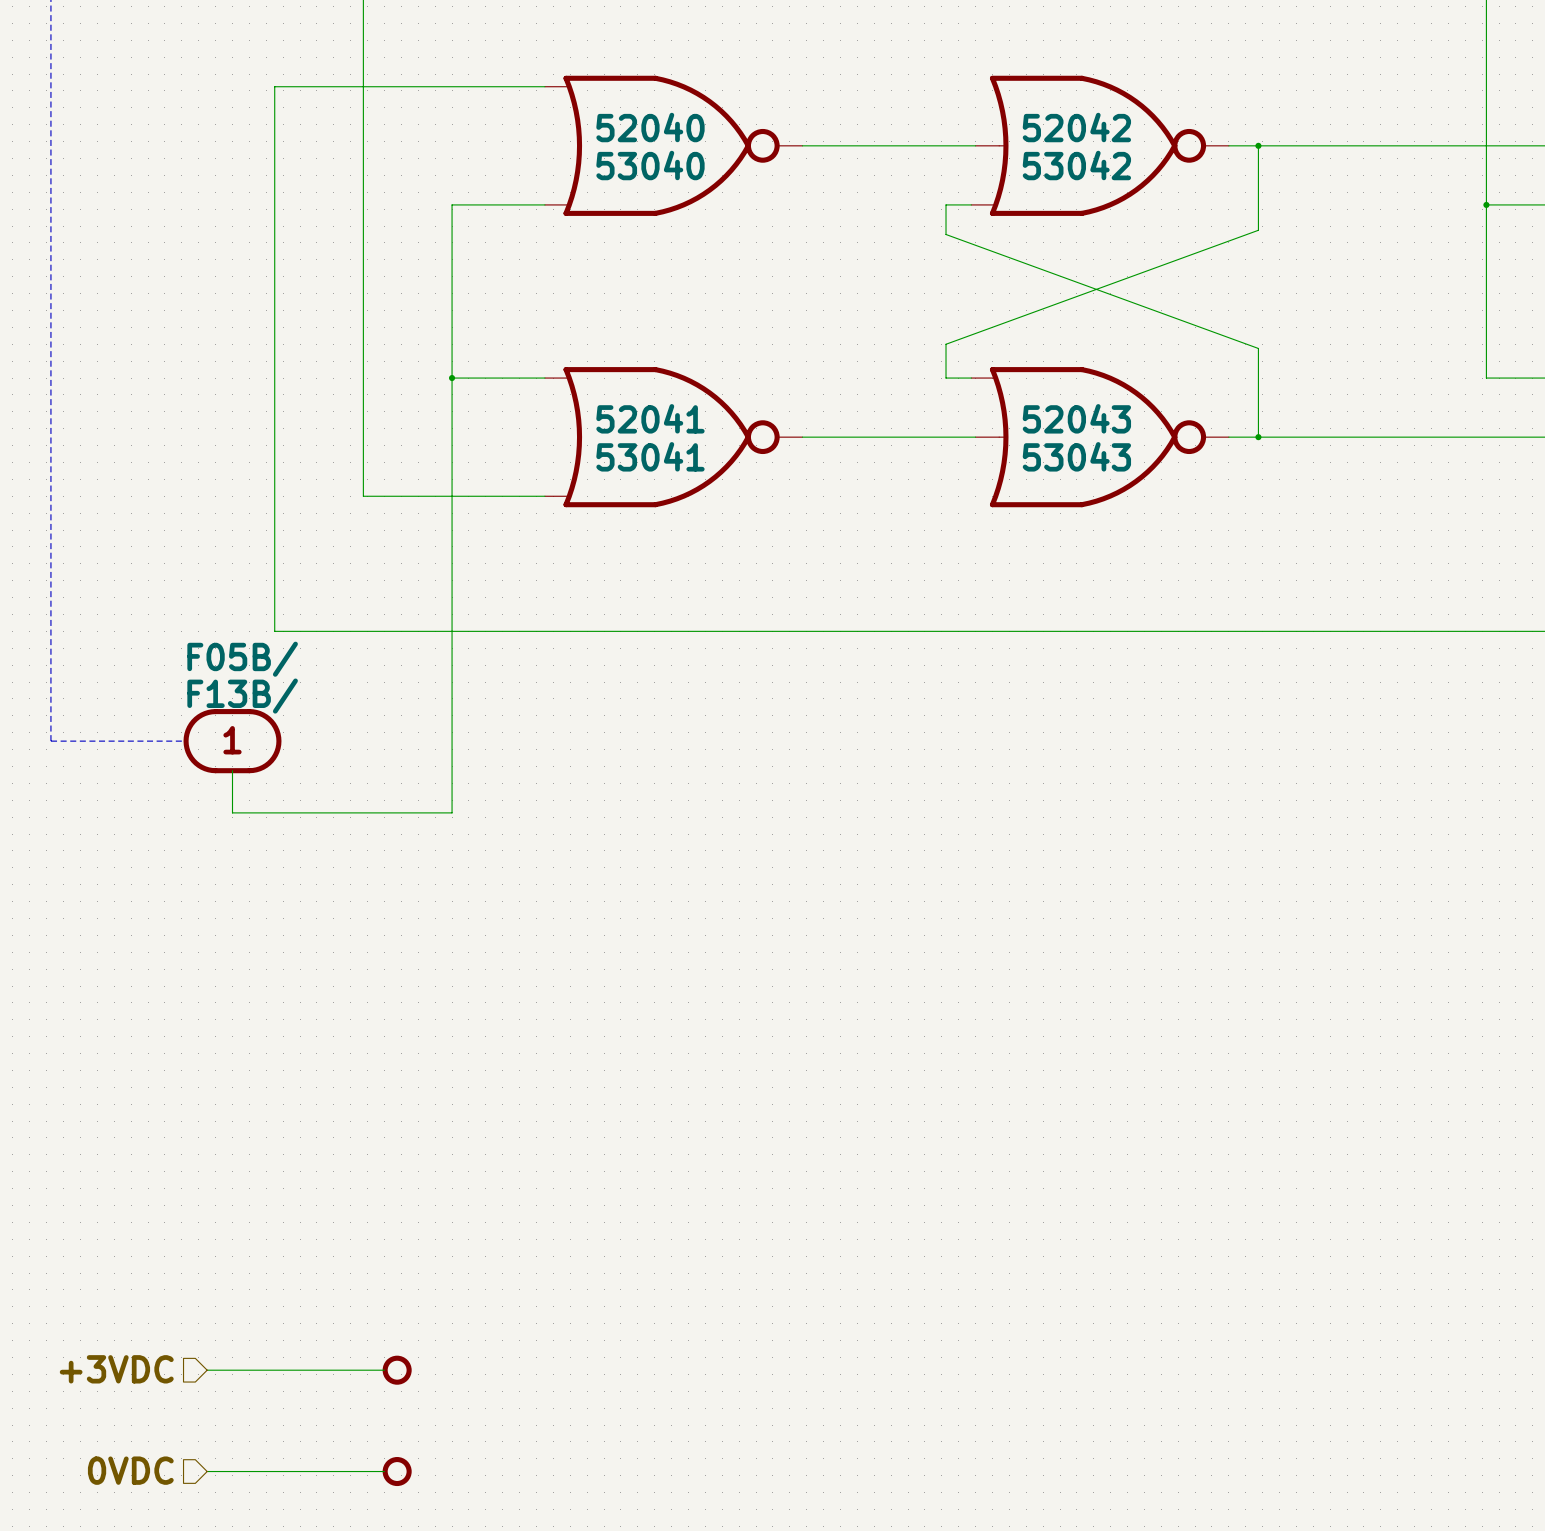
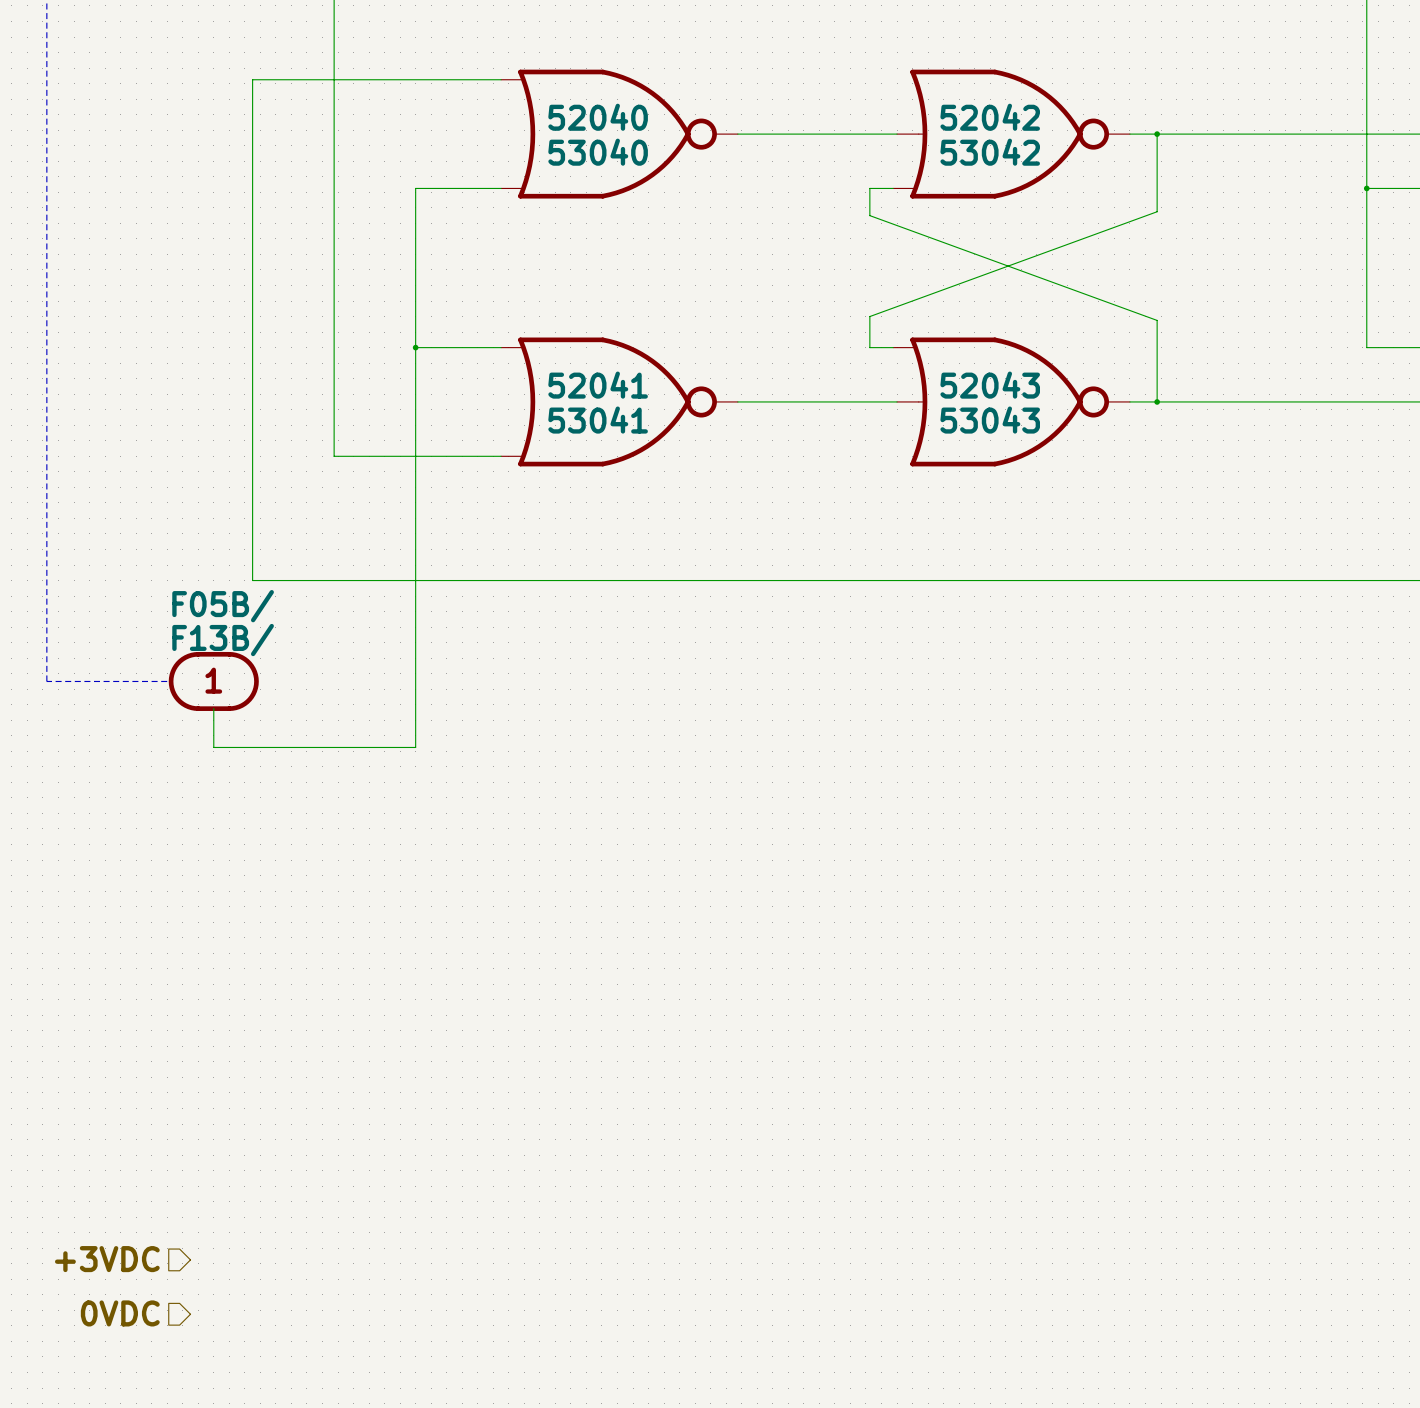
wire: (207, 1370) (384, 1370) -> none
part: (397, 1370) -> none
hierarchical label position: 0VDC (130, 1470) -> 0VDC (120, 1313)
wire: (207, 1471) (384, 1471) -> none
part: (397, 1471) -> none

